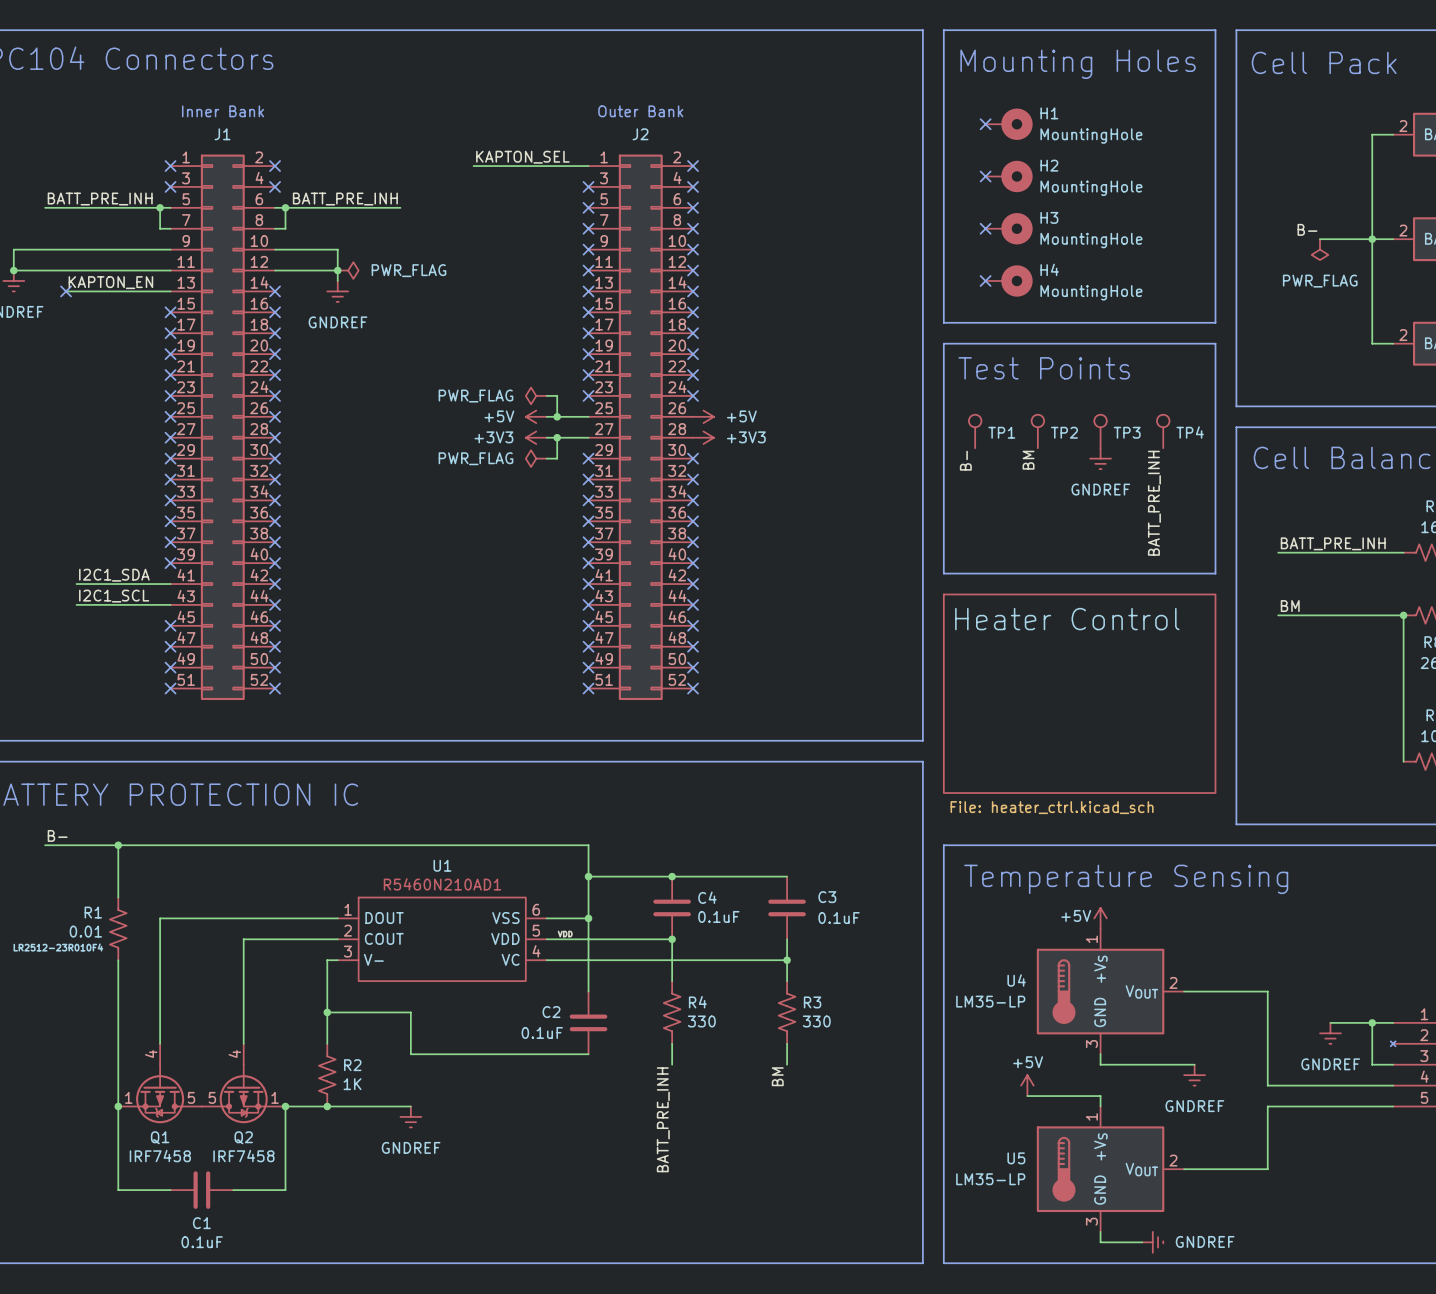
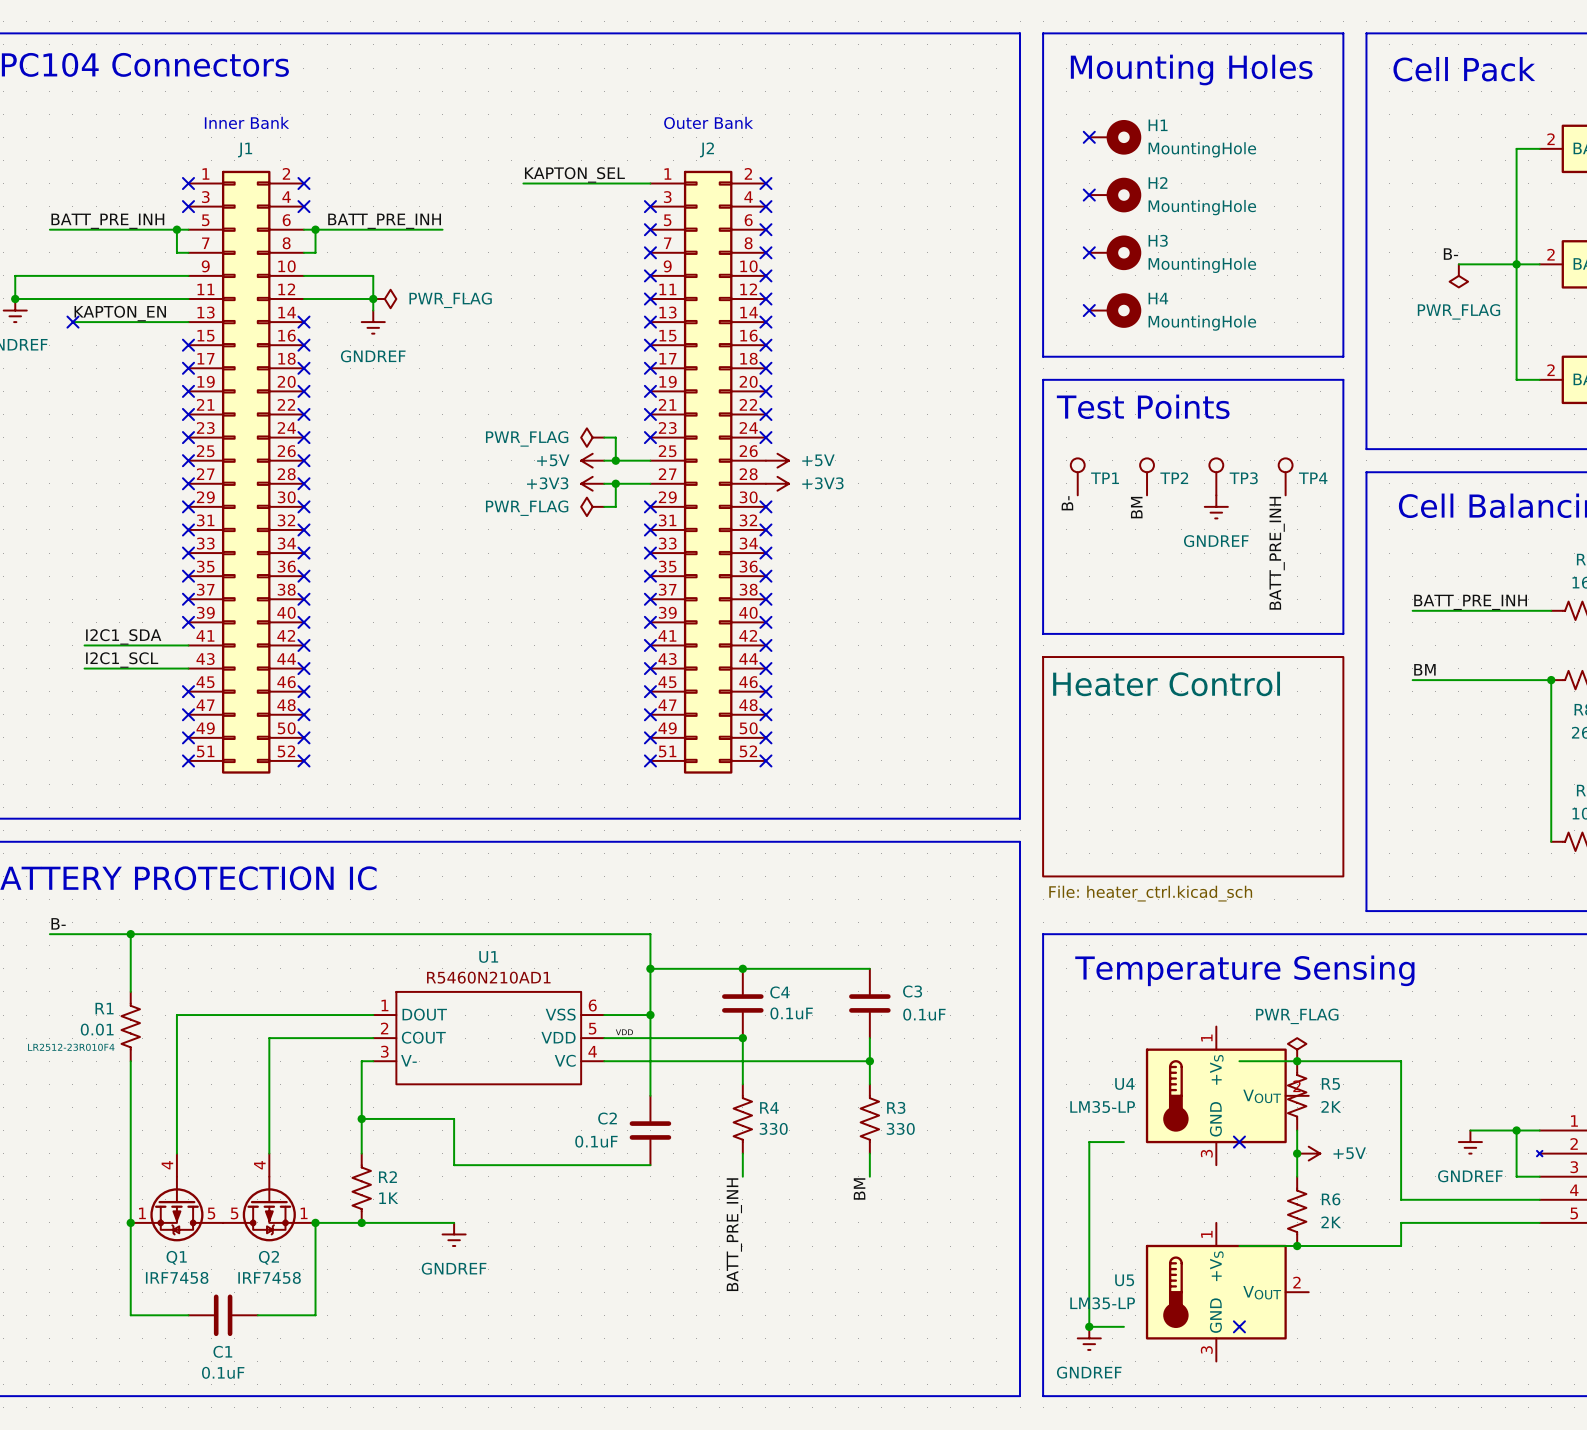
power symbol: +5V (1100, 918) -> none
power symbol: none -> PWR_FLAG (1297, 1049)
junction: none -> (1297, 1061)
R5: none -> 2K (1297, 1095)
wire: (1184, 991) (1267, 991) -> (1239, 1061) (1401, 1061) (1401, 1095)
wire: none -> (1297, 1130) (1297, 1176)
wire: none -> (1123, 1142) (1089, 1142) (1089, 1326) (1123, 1326)
no-connect mark: none -> (1239, 1142)
junction: none -> (1297, 1153)
power symbol: none -> +5V (1308, 1153)
wire: (1100, 1054) (1100, 1064) (1194, 1064) -> none
power symbol: GNDREF (1194, 1075) -> none
power symbol: +5V (1027, 1085) -> none
wire: (1027, 1096) (1100, 1096) (1100, 1106) -> none
R6: none -> 2K (1297, 1211)
junction: none -> (1297, 1246)
wire: (1267, 1127) (1267, 1169) (1184, 1169) -> (1401, 1246) (1239, 1246)
junction: none -> (1089, 1326)
no-connect mark: none -> (1239, 1326)
power symbol: none -> GNDREF (1089, 1338)
wire: (1100, 1231) (1100, 1242) (1142, 1242) -> none
power symbol: GNDREF (1152, 1242) -> none

